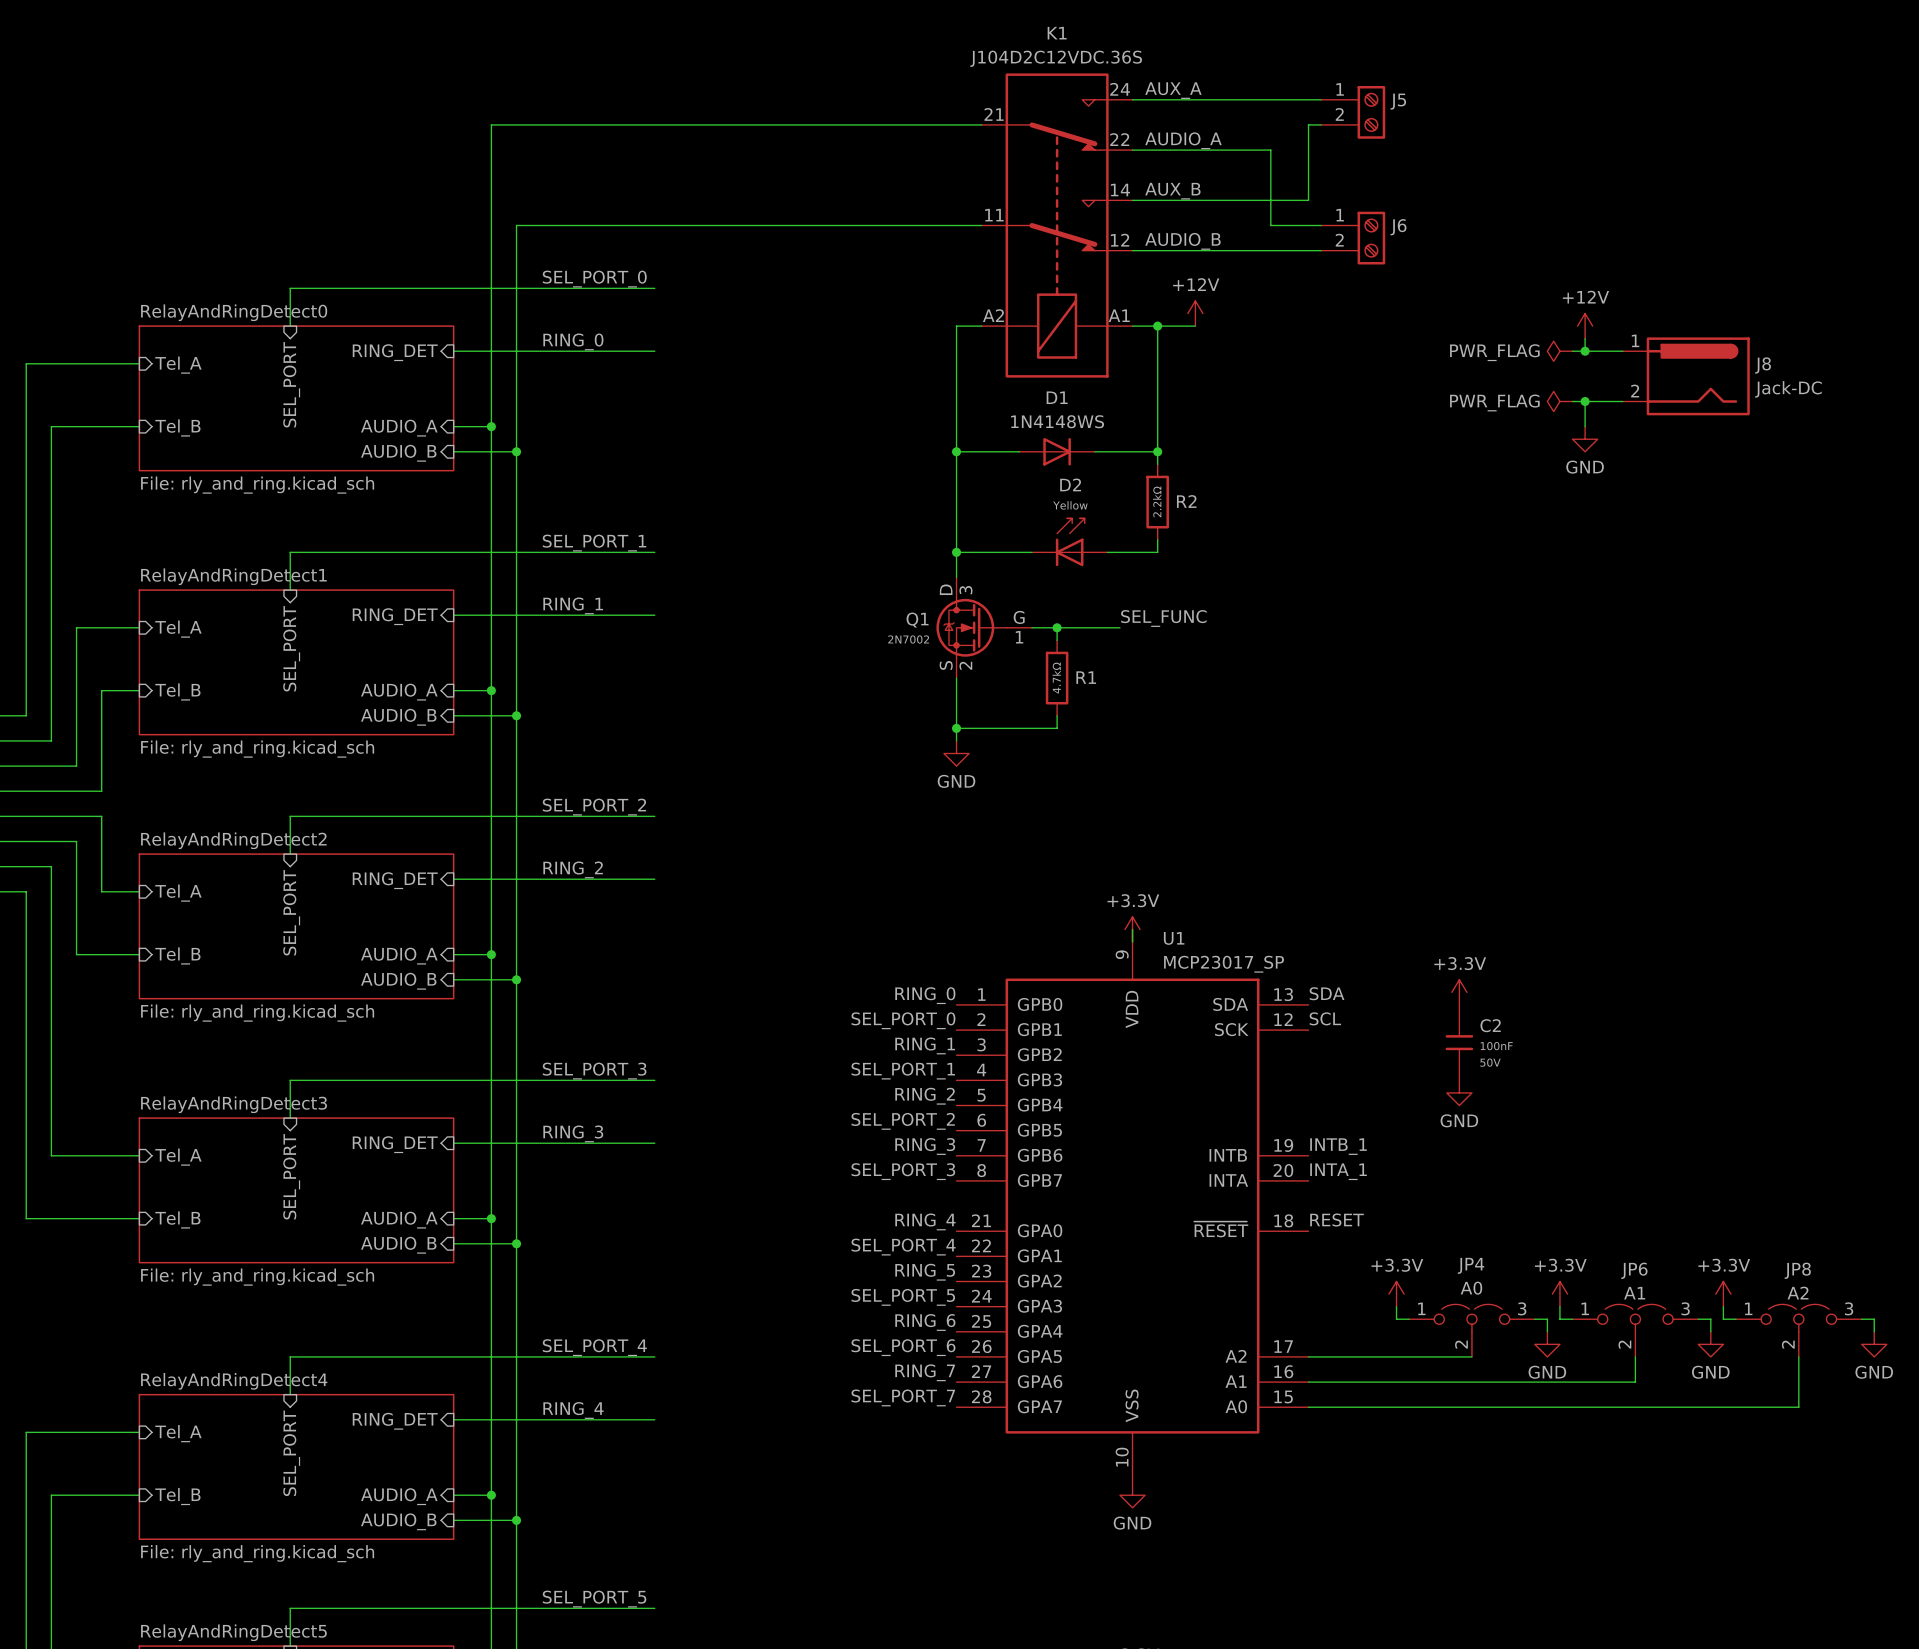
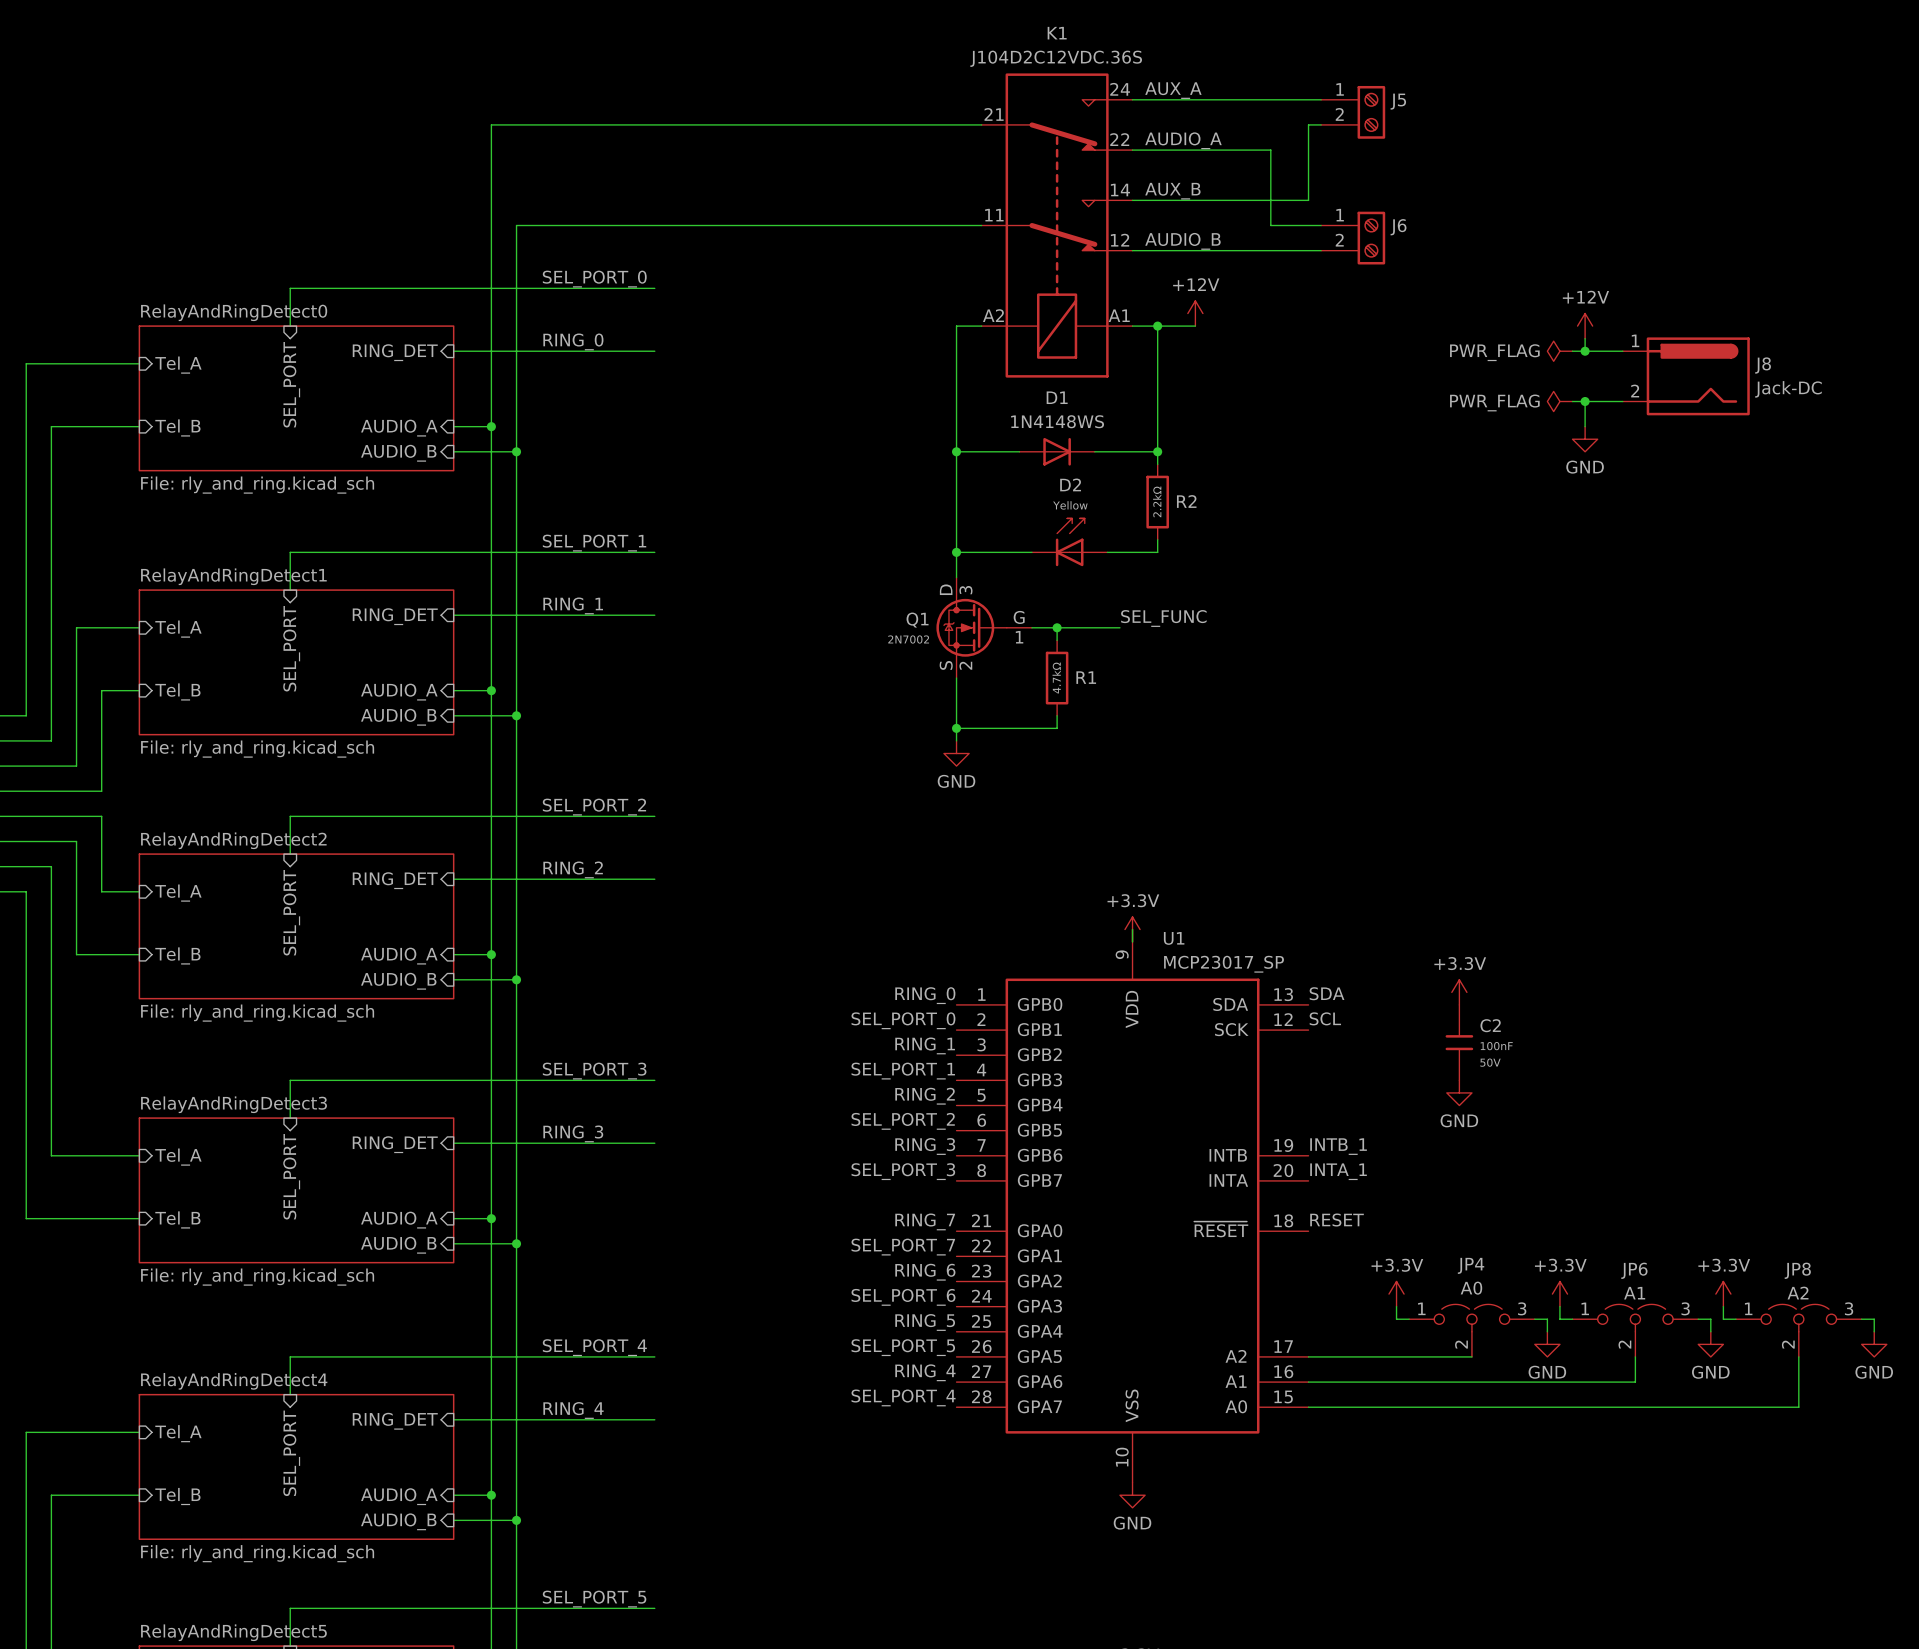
label: RING_4 (925, 1221) -> RING_7 (925, 1221)
label: SEL_PORT_4 (903, 1247) -> SEL_PORT_7 (903, 1247)
label: RING_5 (925, 1272) -> RING_6 (925, 1272)
label: SEL_PORT_5 (903, 1297) -> SEL_PORT_6 (903, 1297)
label: RING_6 (925, 1322) -> RING_5 (925, 1322)
label: SEL_PORT_6 (903, 1347) -> SEL_PORT_5 (903, 1347)
label: RING_7 (925, 1372) -> RING_4 (925, 1372)
label: SEL_PORT_7 (903, 1397) -> SEL_PORT_4 (903, 1397)

